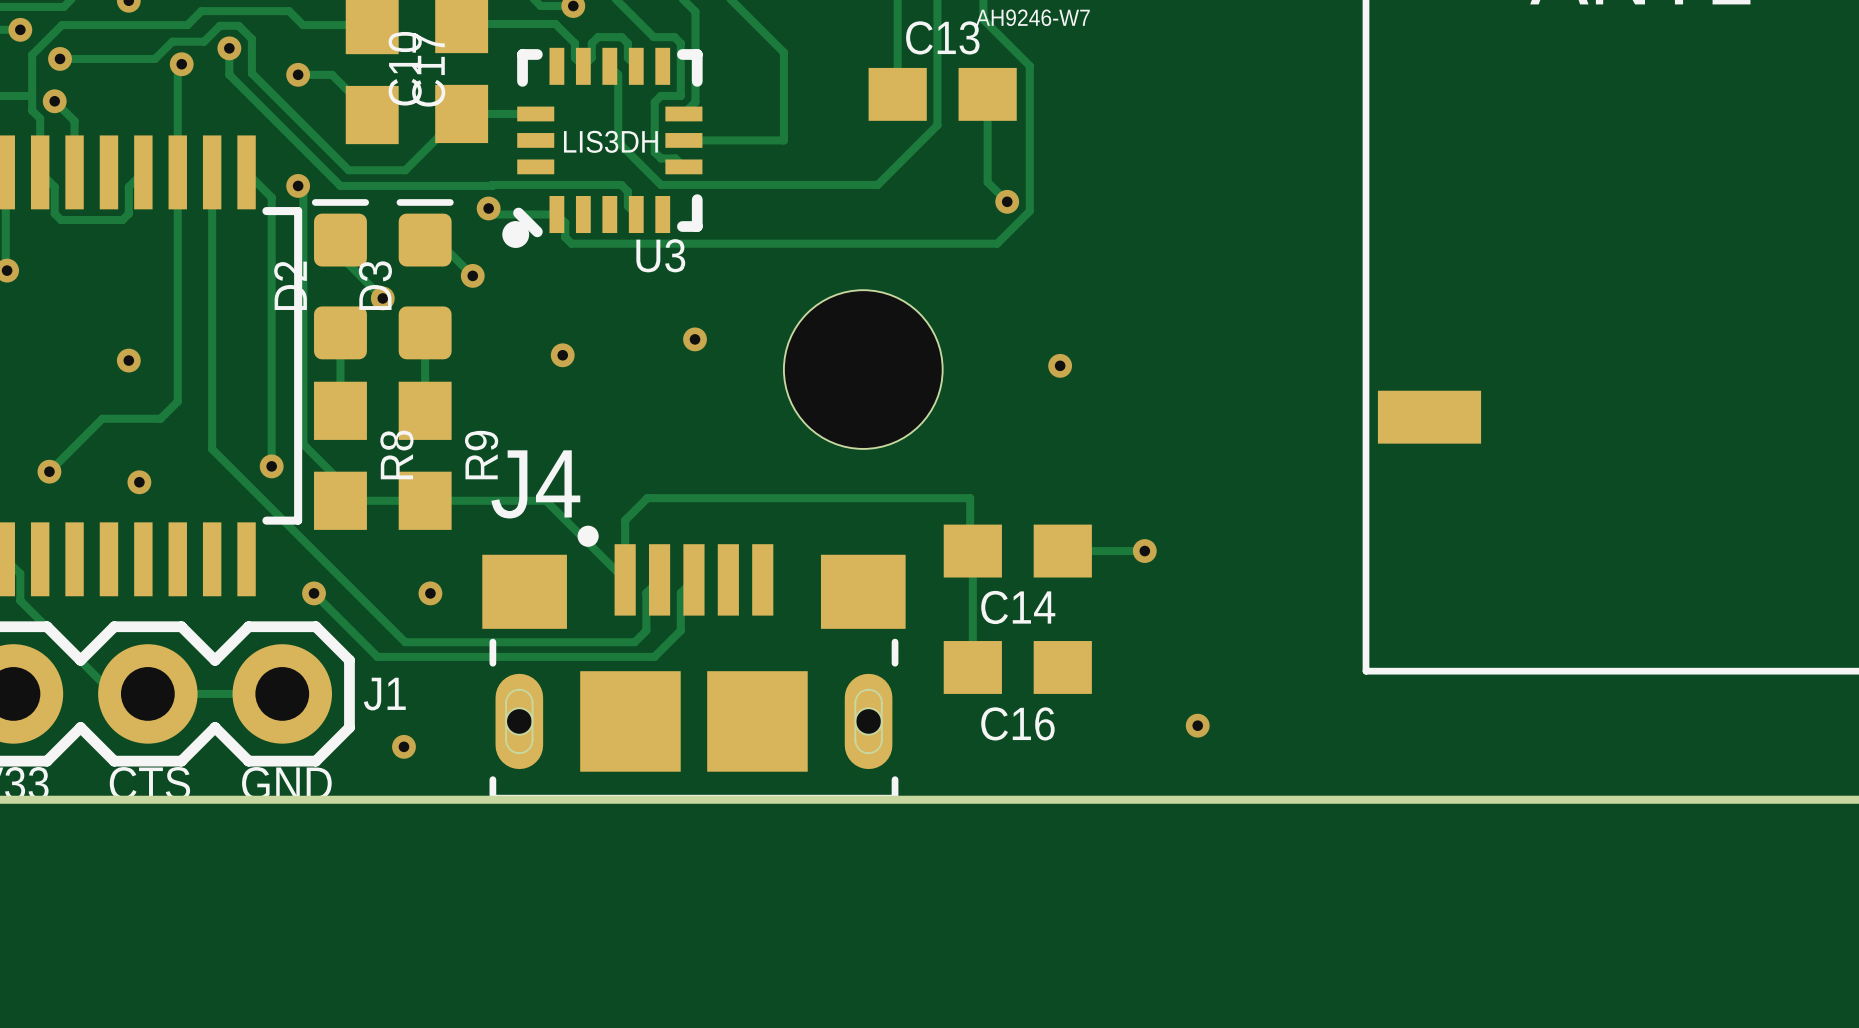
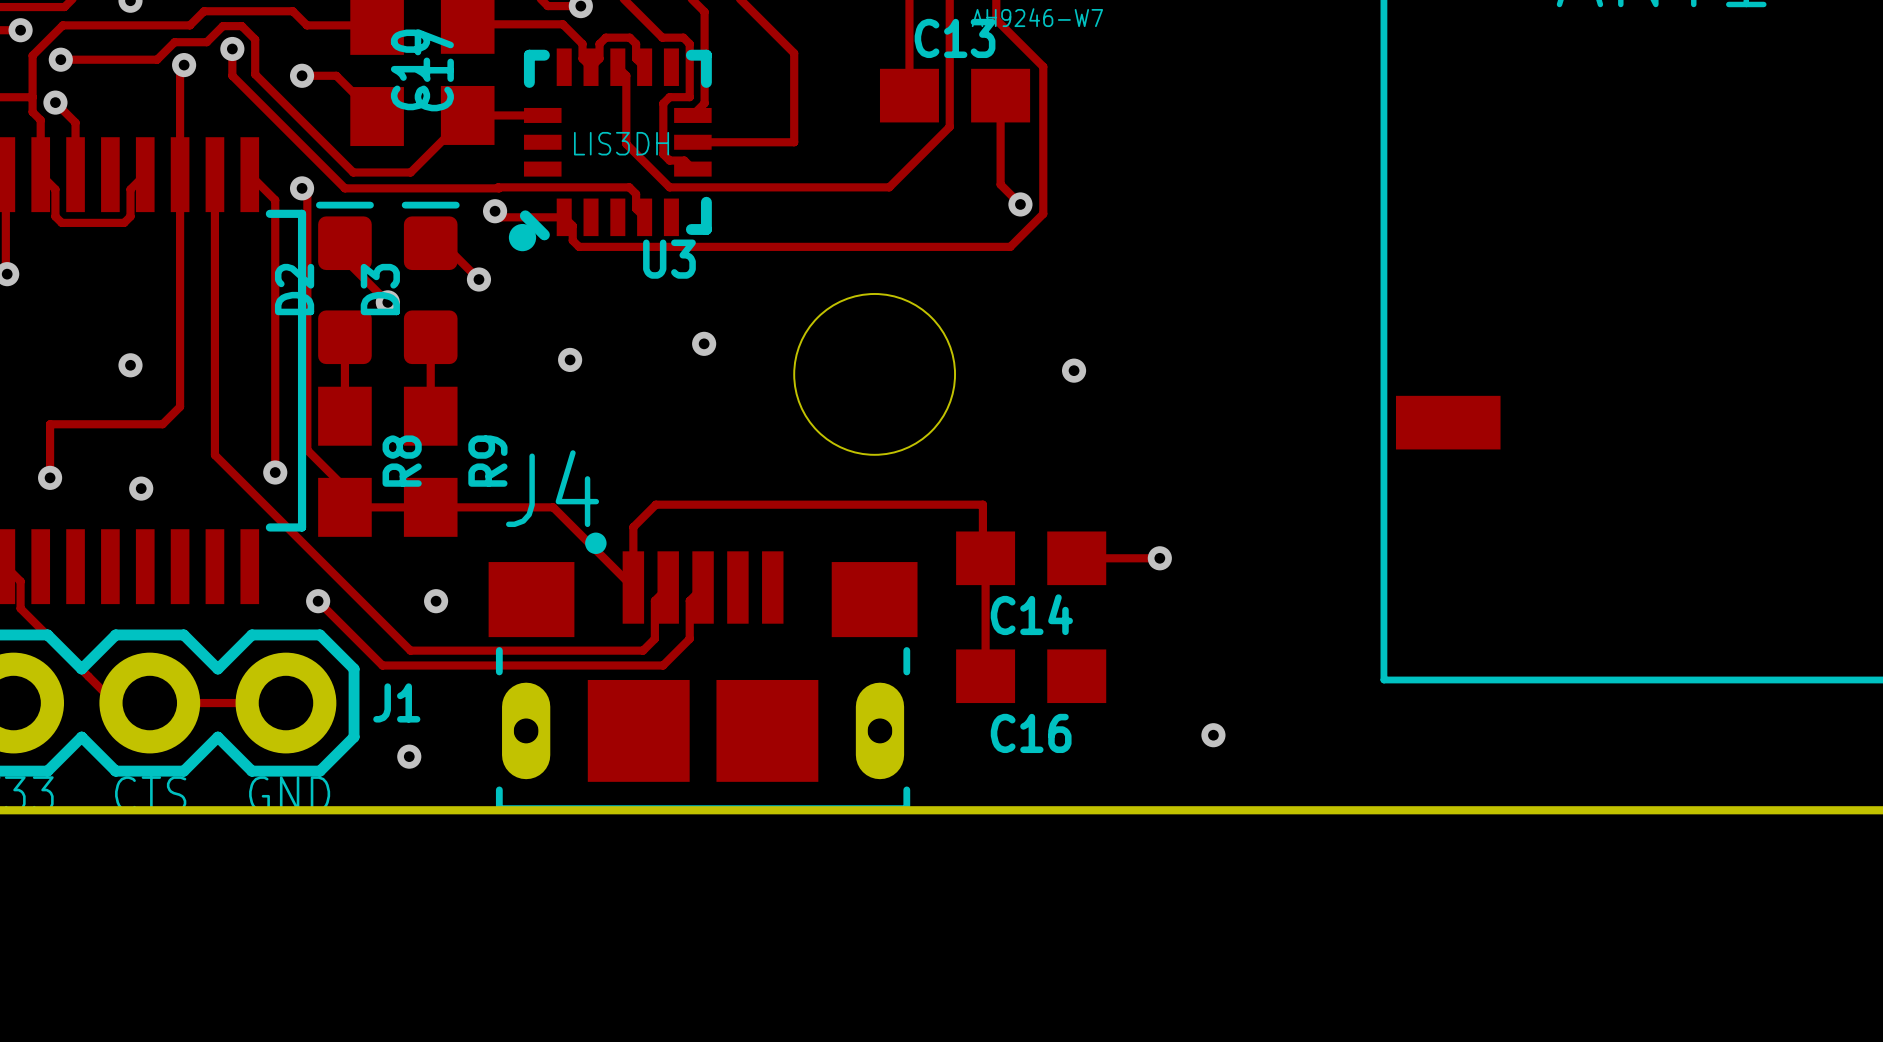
track: (102, 418) (49, 471) -> (103, 424) (50, 424) (50, 477)

